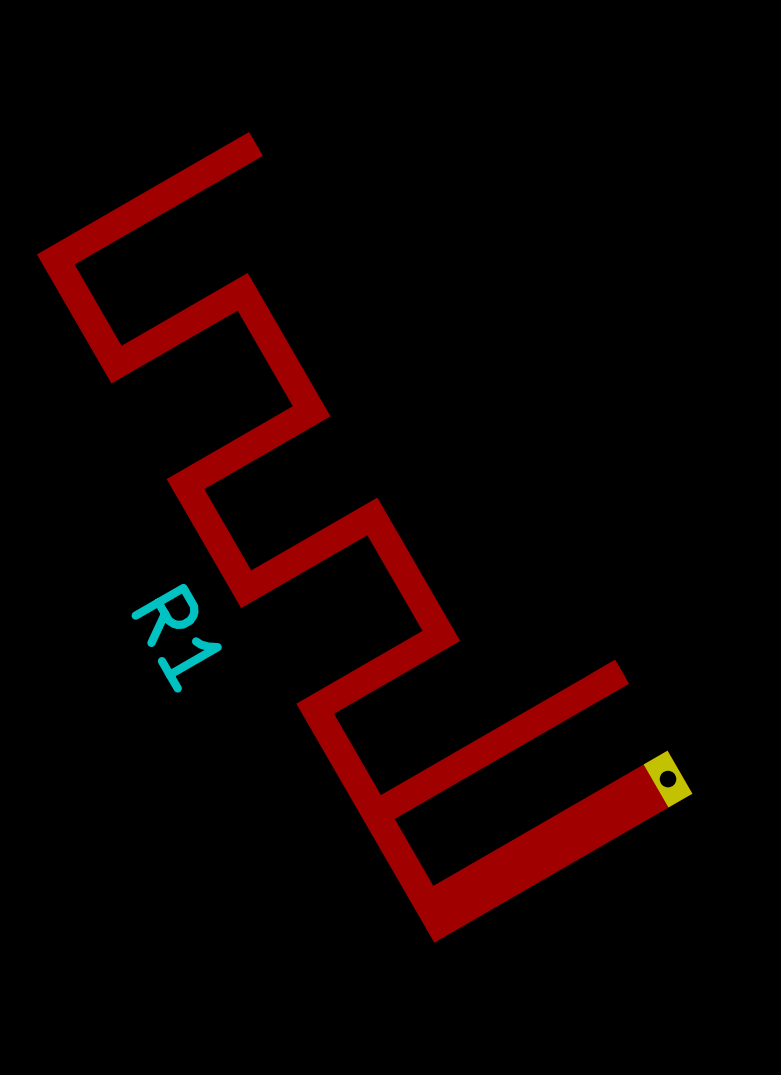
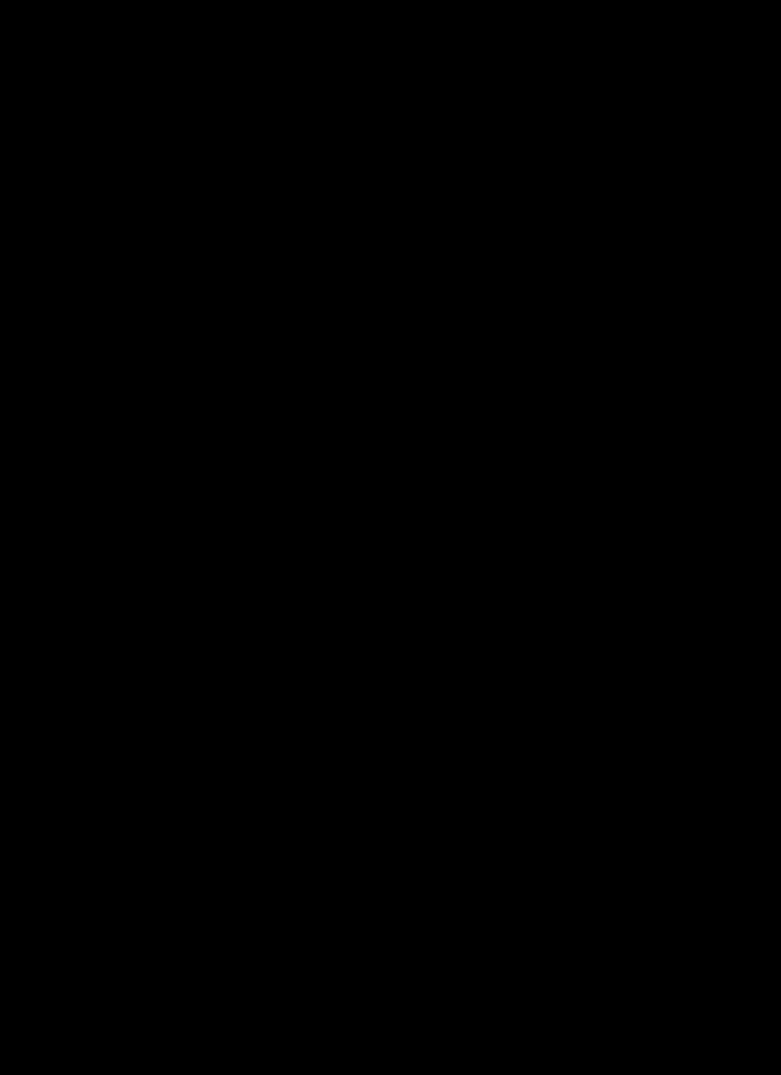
R1: (364, 537) -> none

